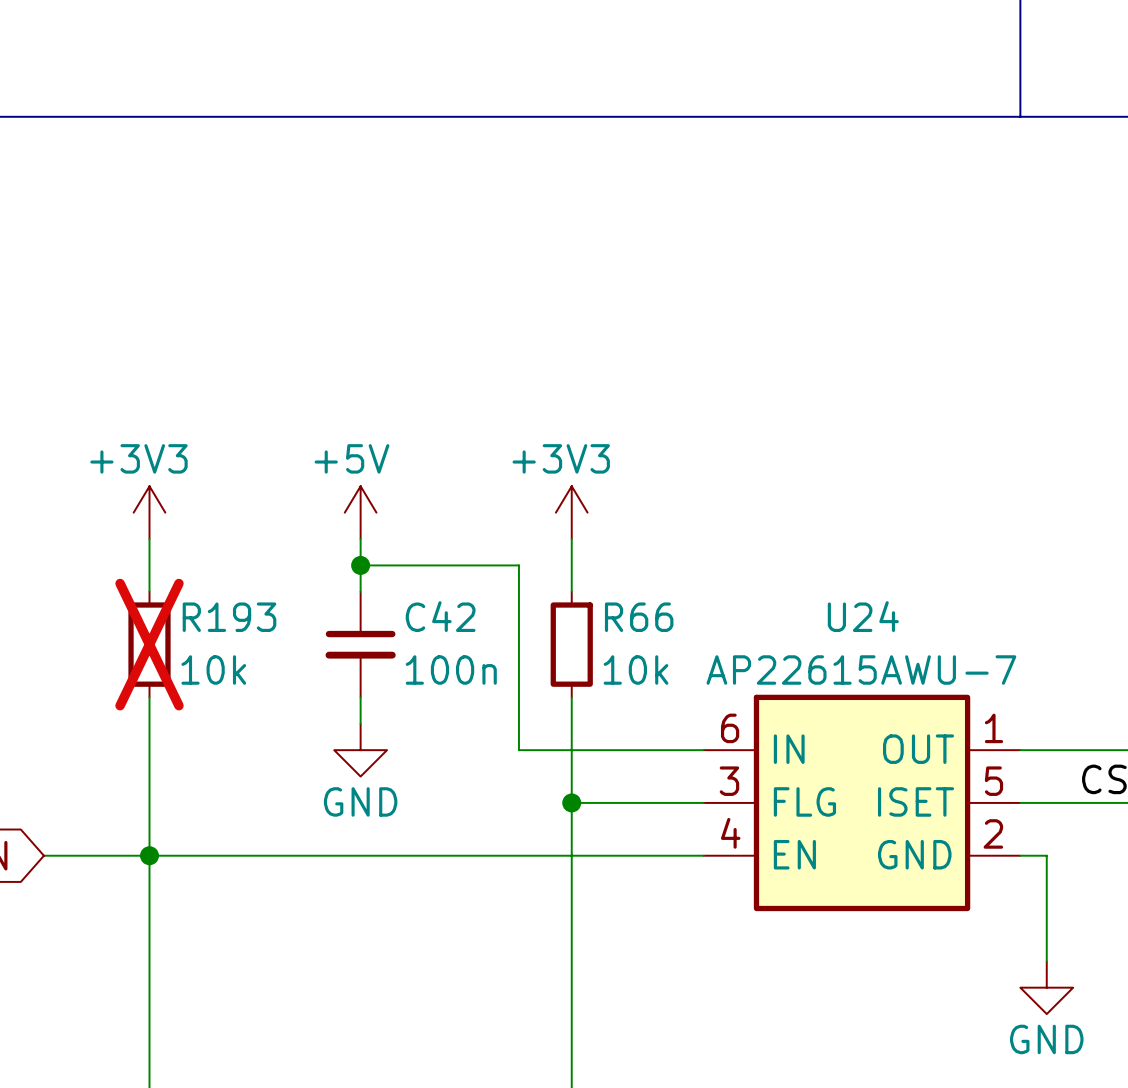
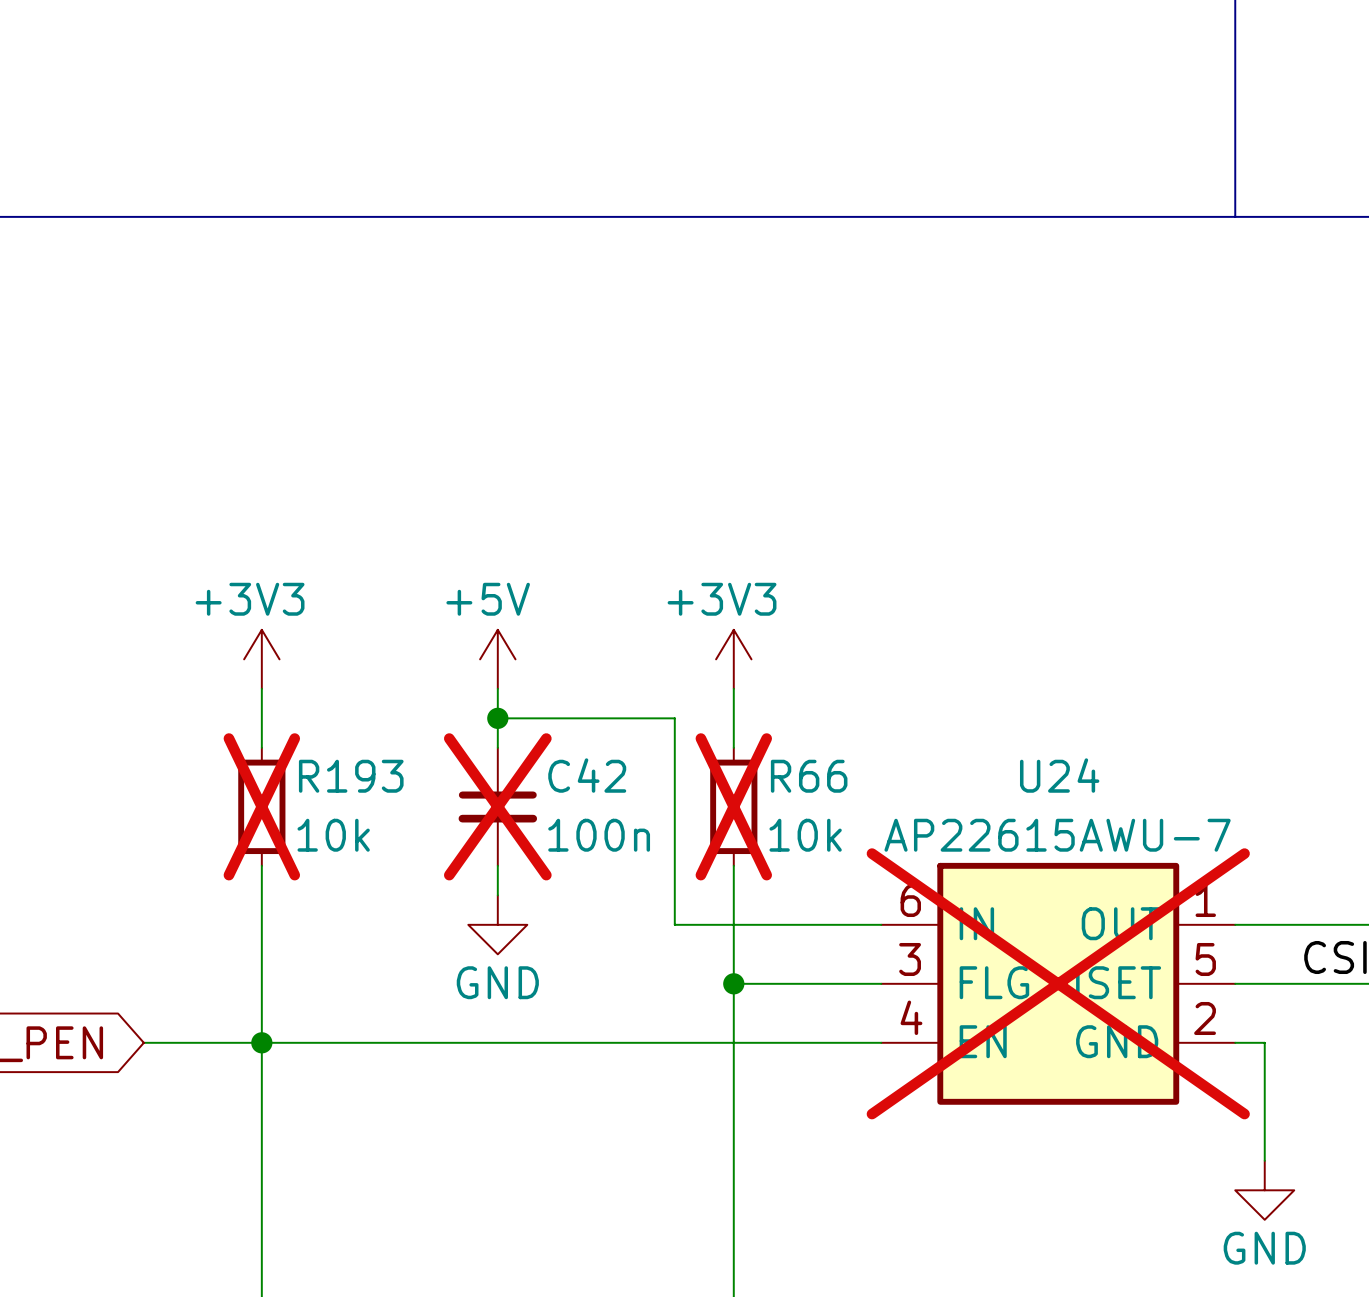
C42 do-not-place cross: none -> (497, 806)
R66 do-not-place cross: none -> (733, 806)
U24 do-not-place cross: none -> (1058, 983)

